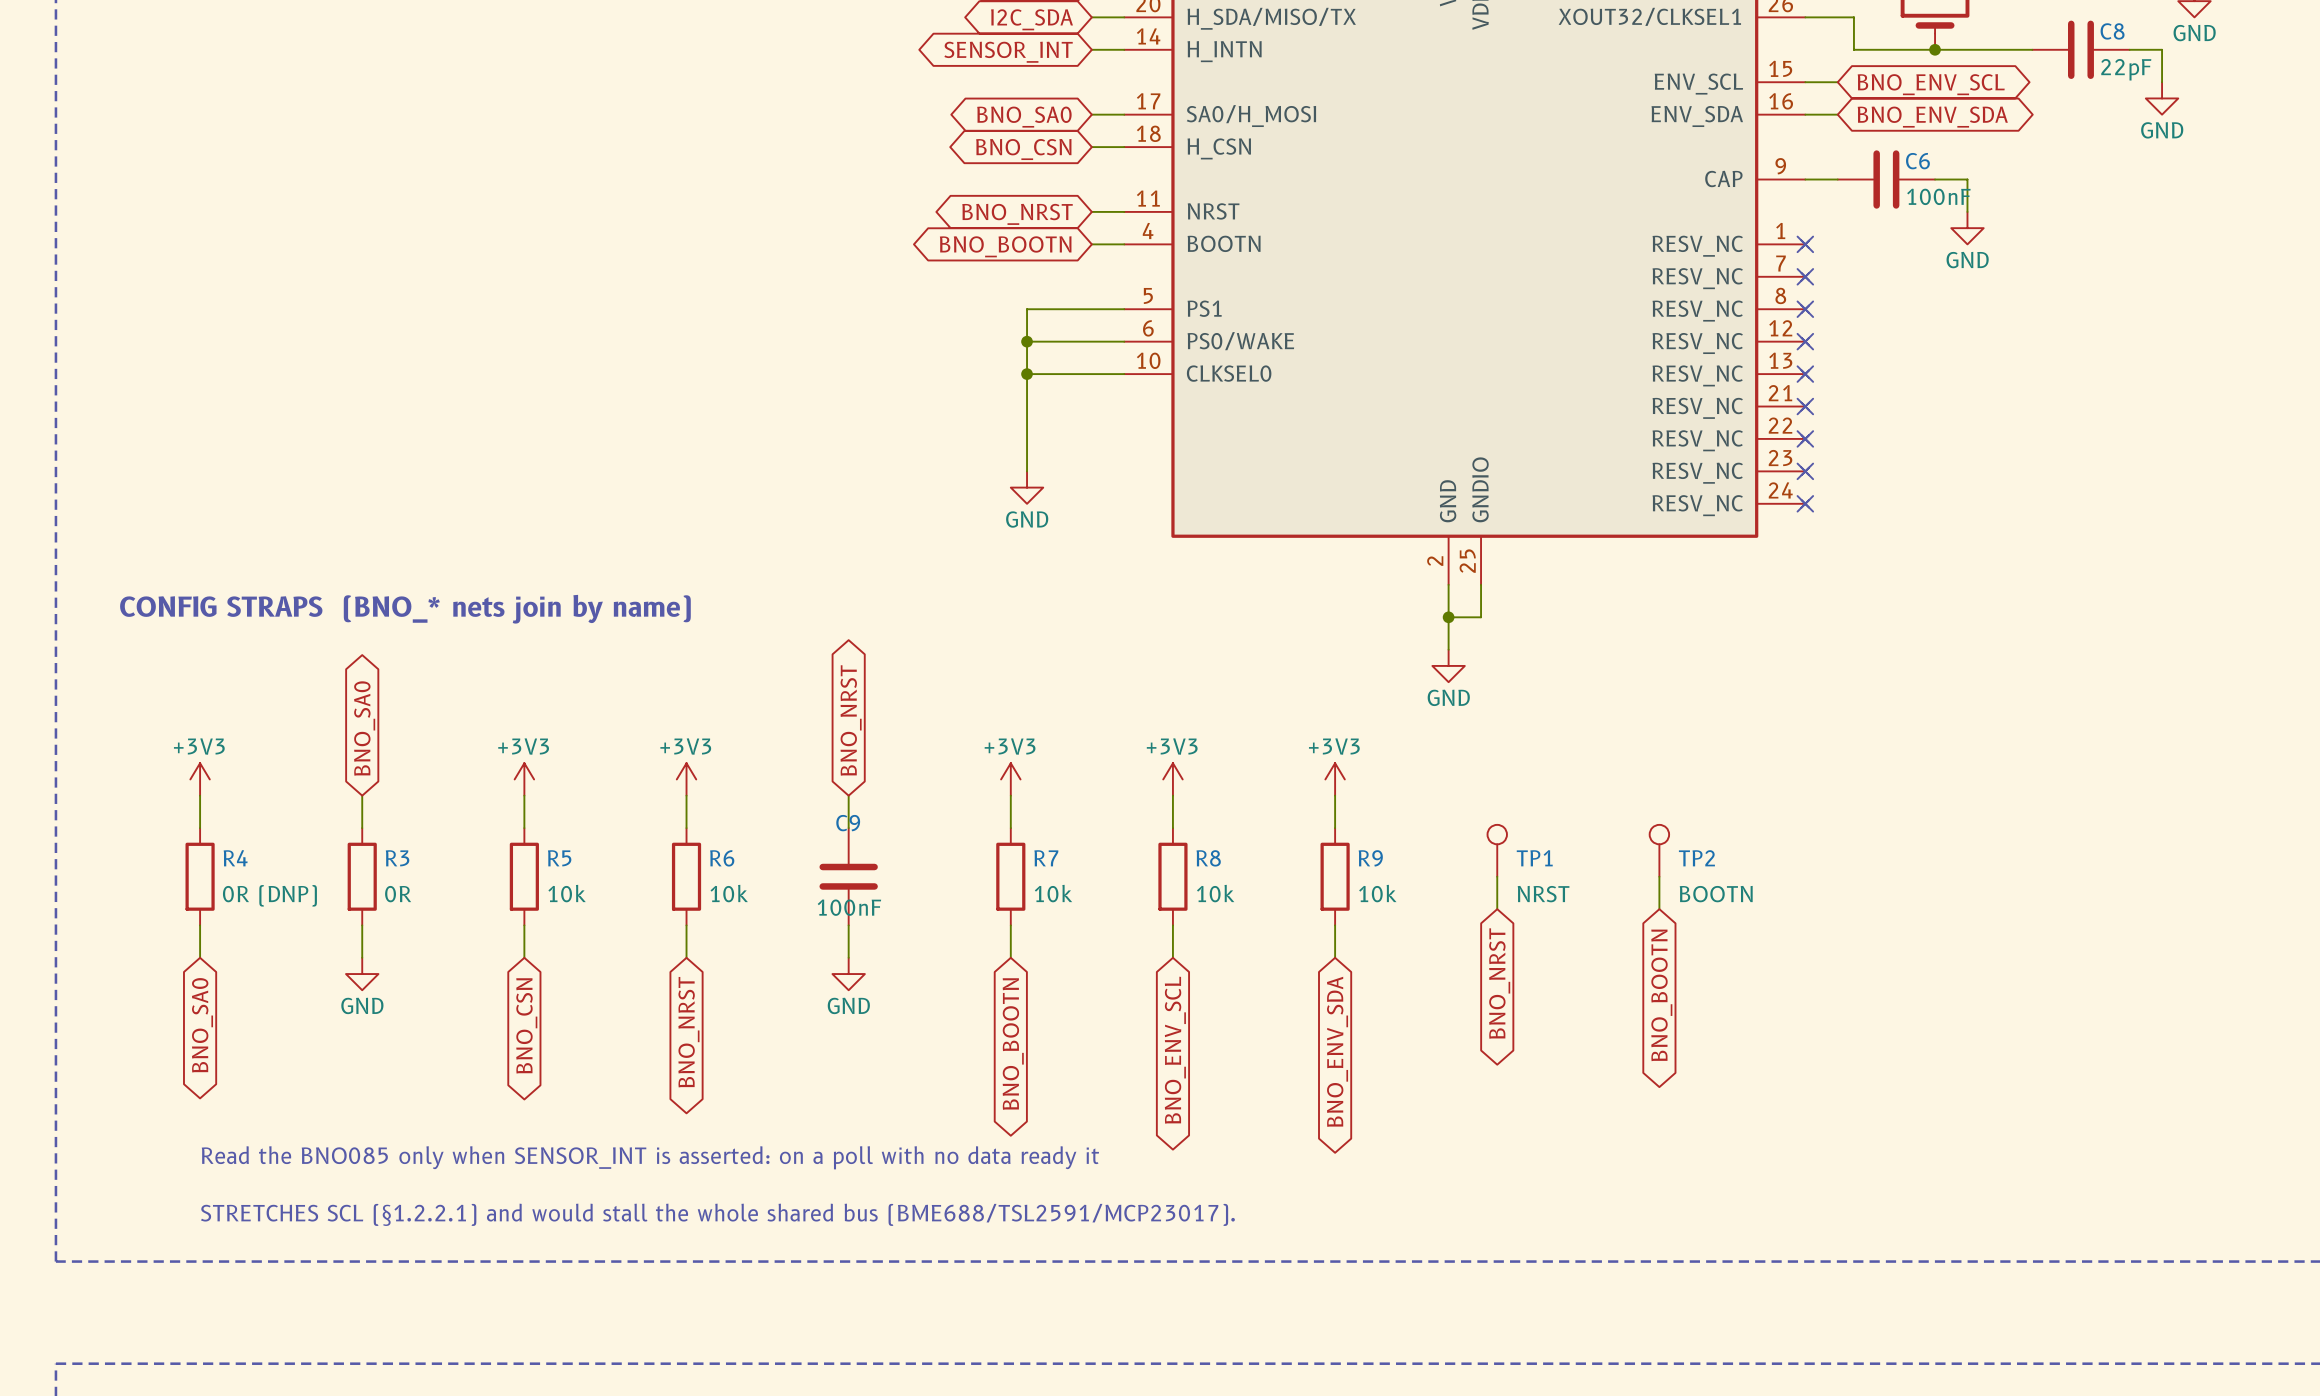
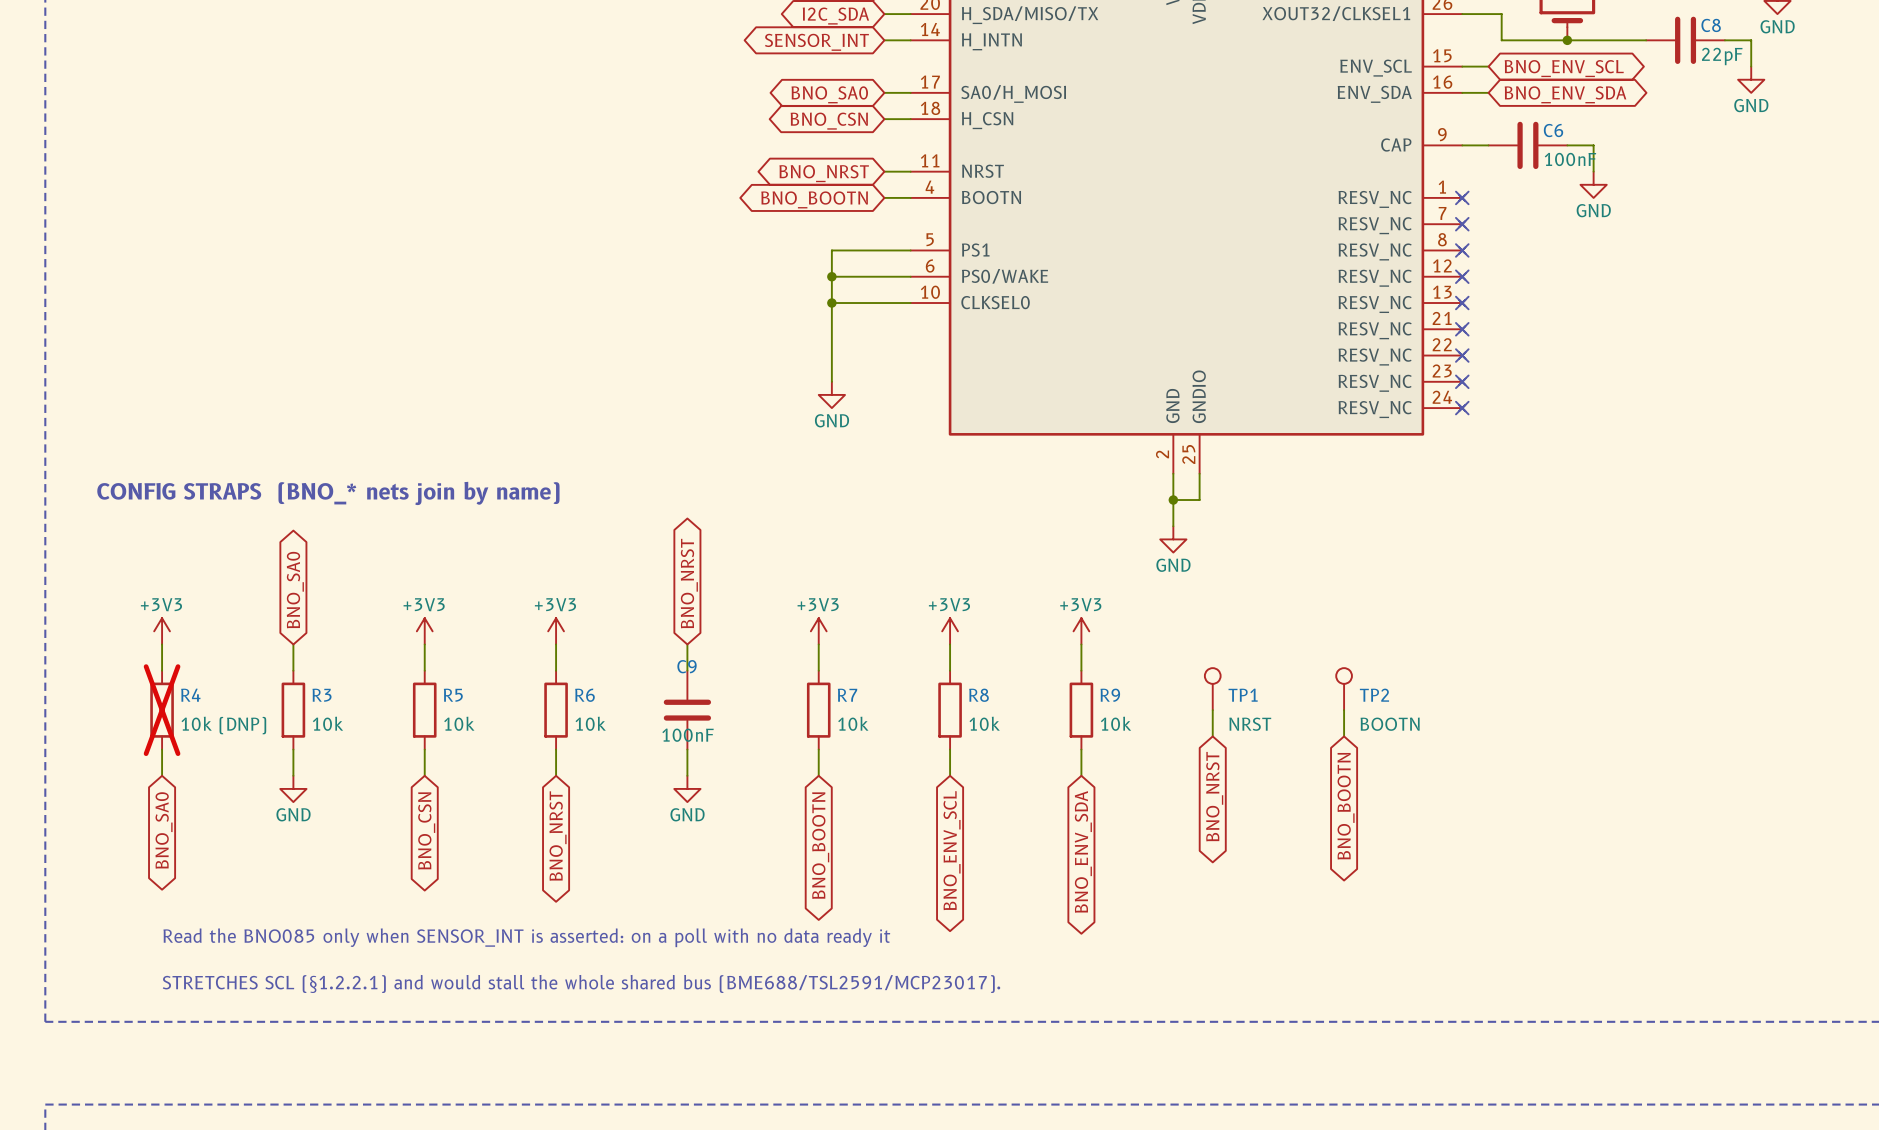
R4 do-not-place cross: none -> (162, 710)
R3 value: 0R (398, 894) -> 10k (327, 723)
R4 value: 0R (DNP) (269, 895) -> 10k (DNP) (223, 725)

